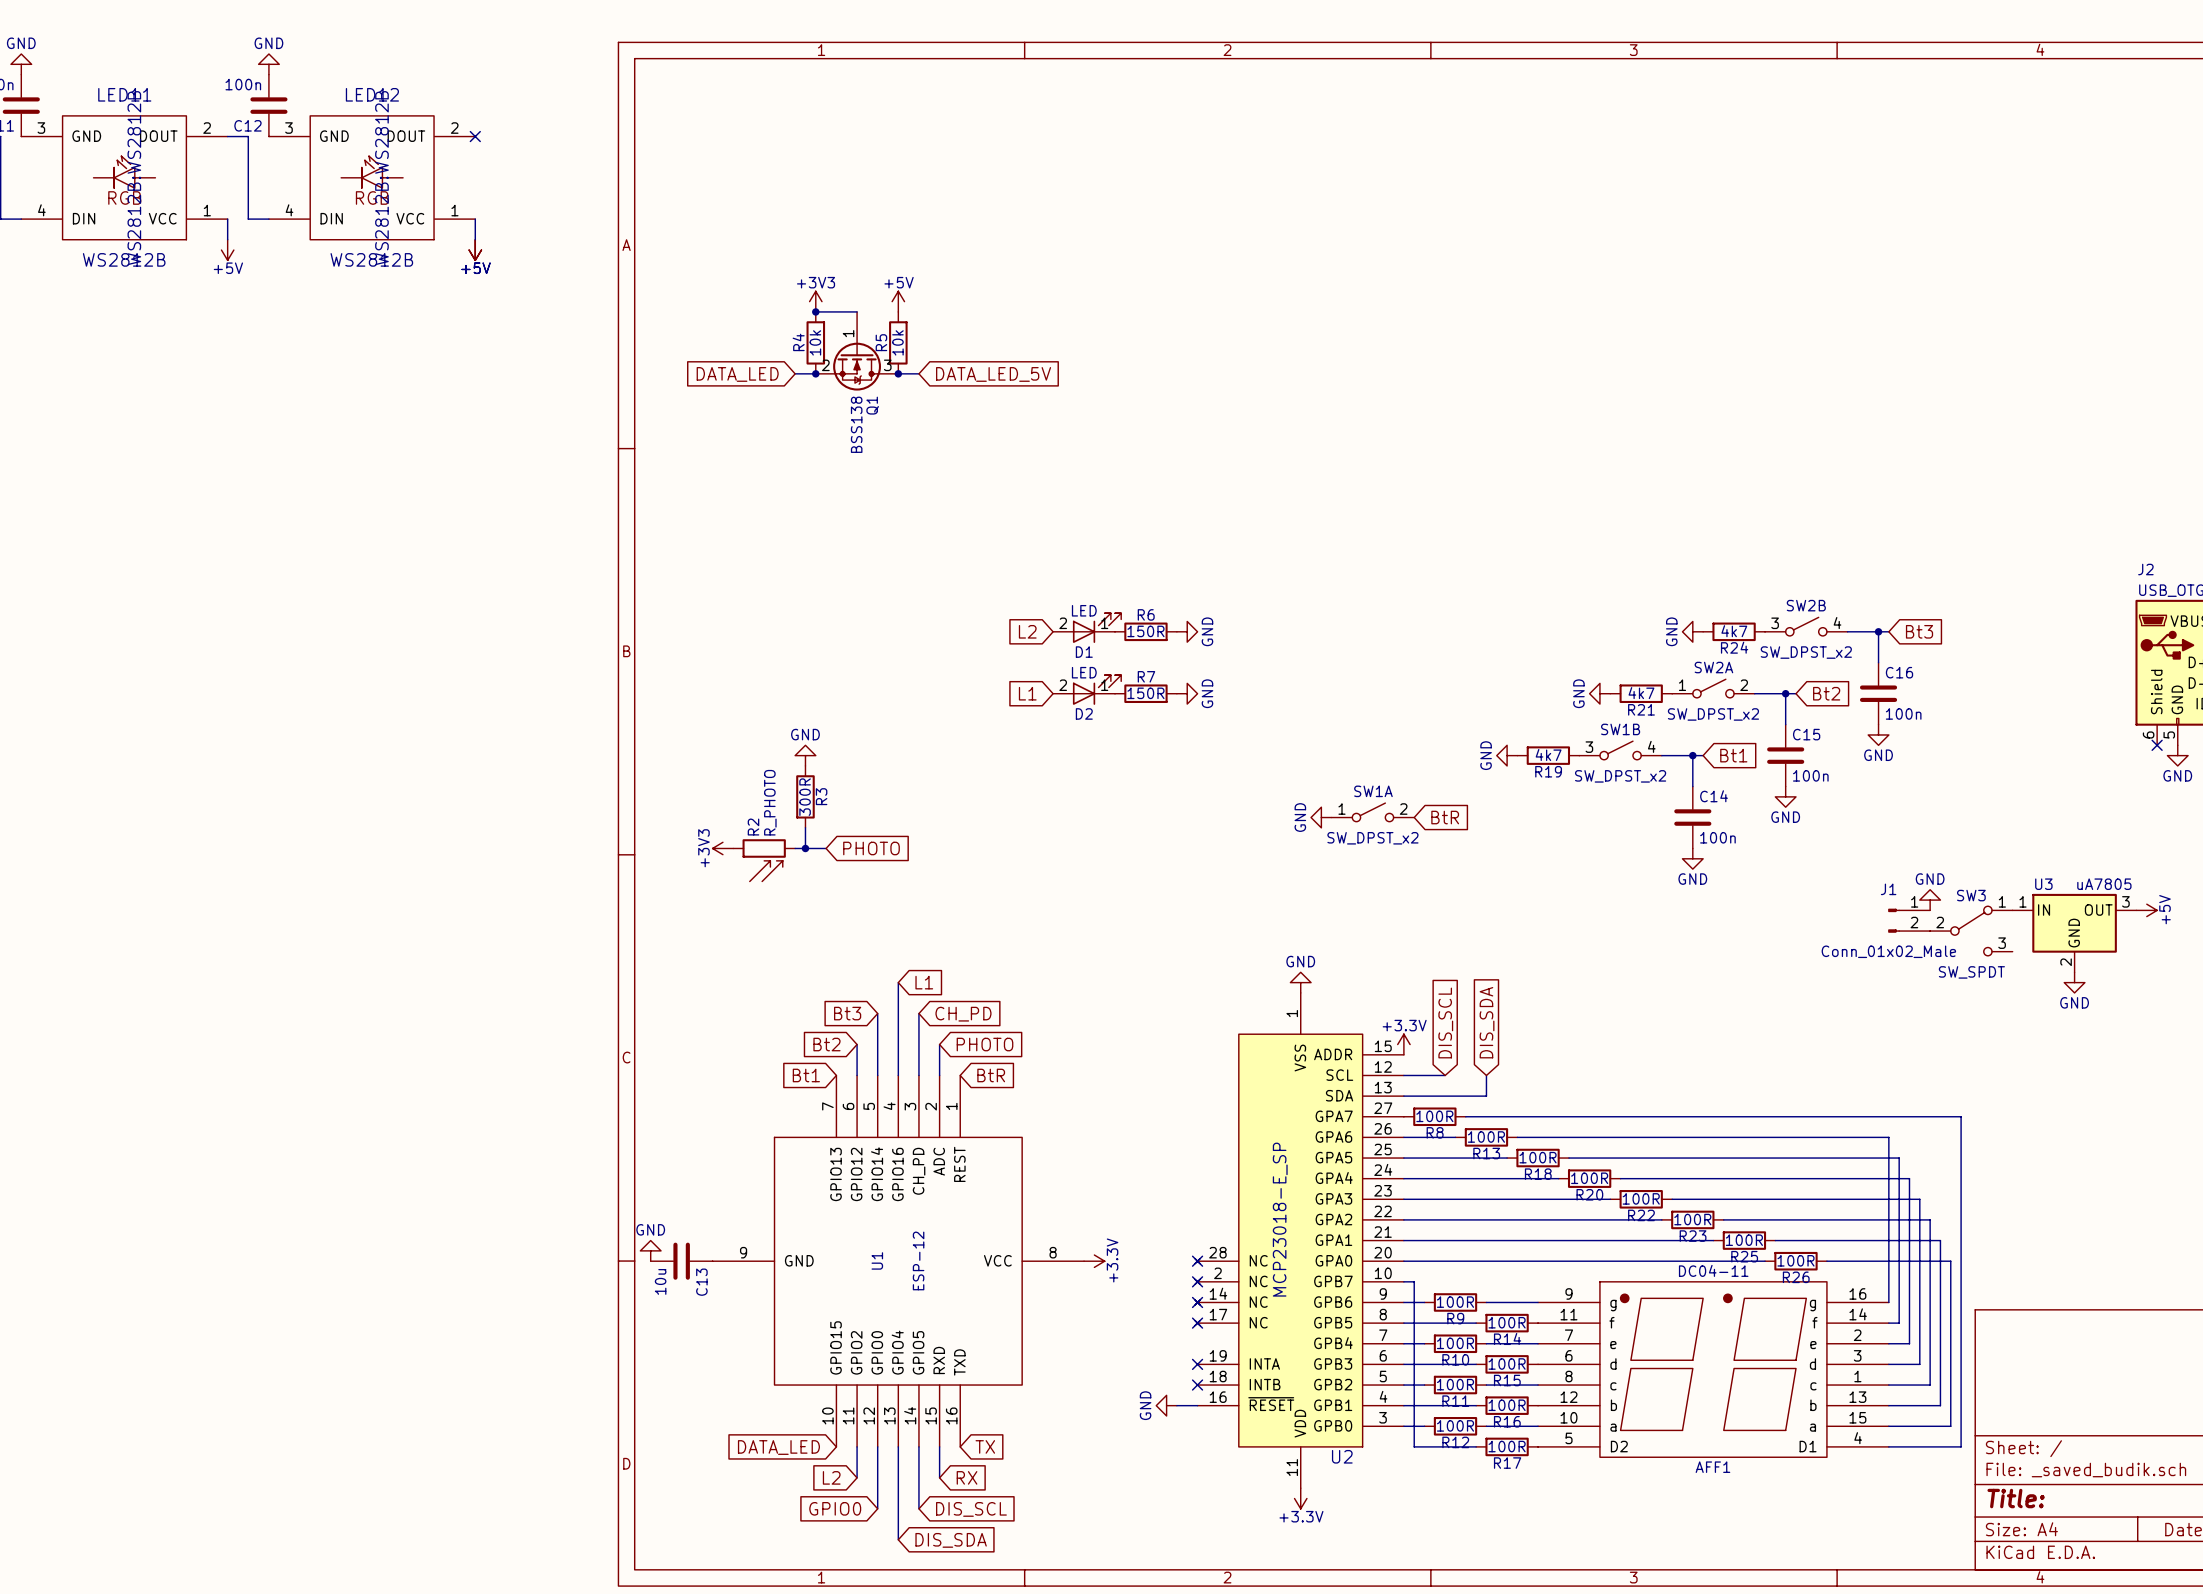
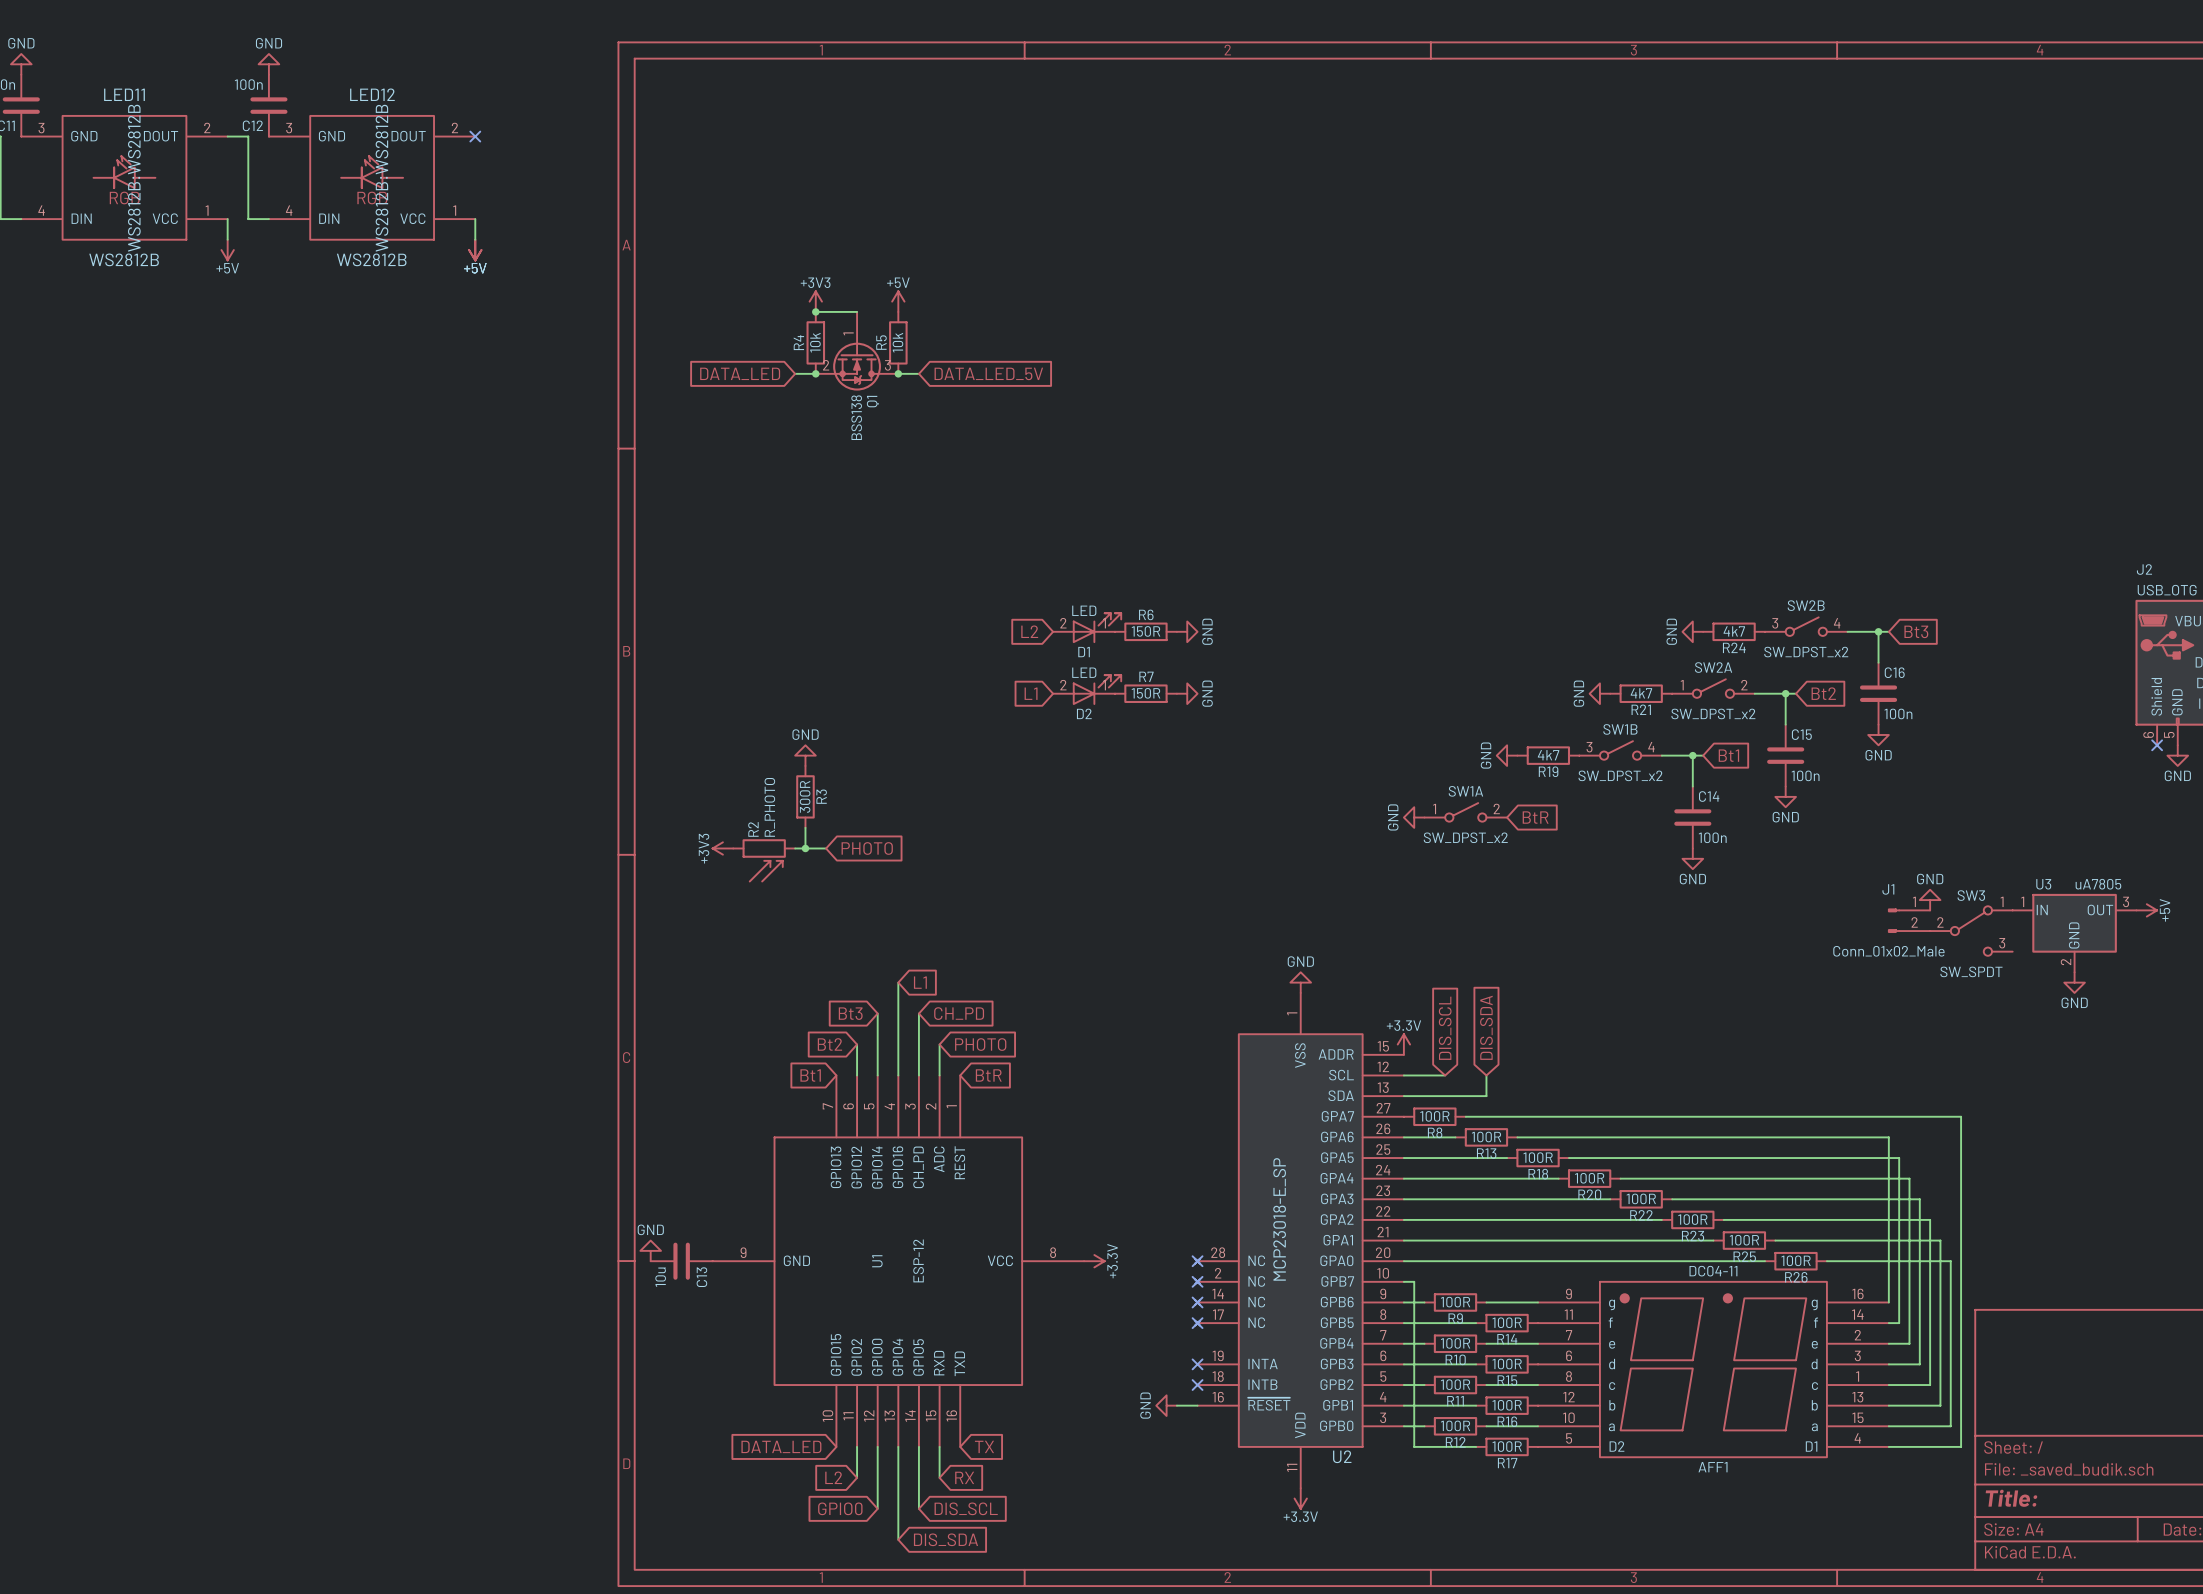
SW1A position: (1372, 812) -> (1465, 812)
power symbol position: GND (1321, 817) -> GND (1414, 817)
global label position: BtR (1445, 817) -> BtR (1535, 817)

